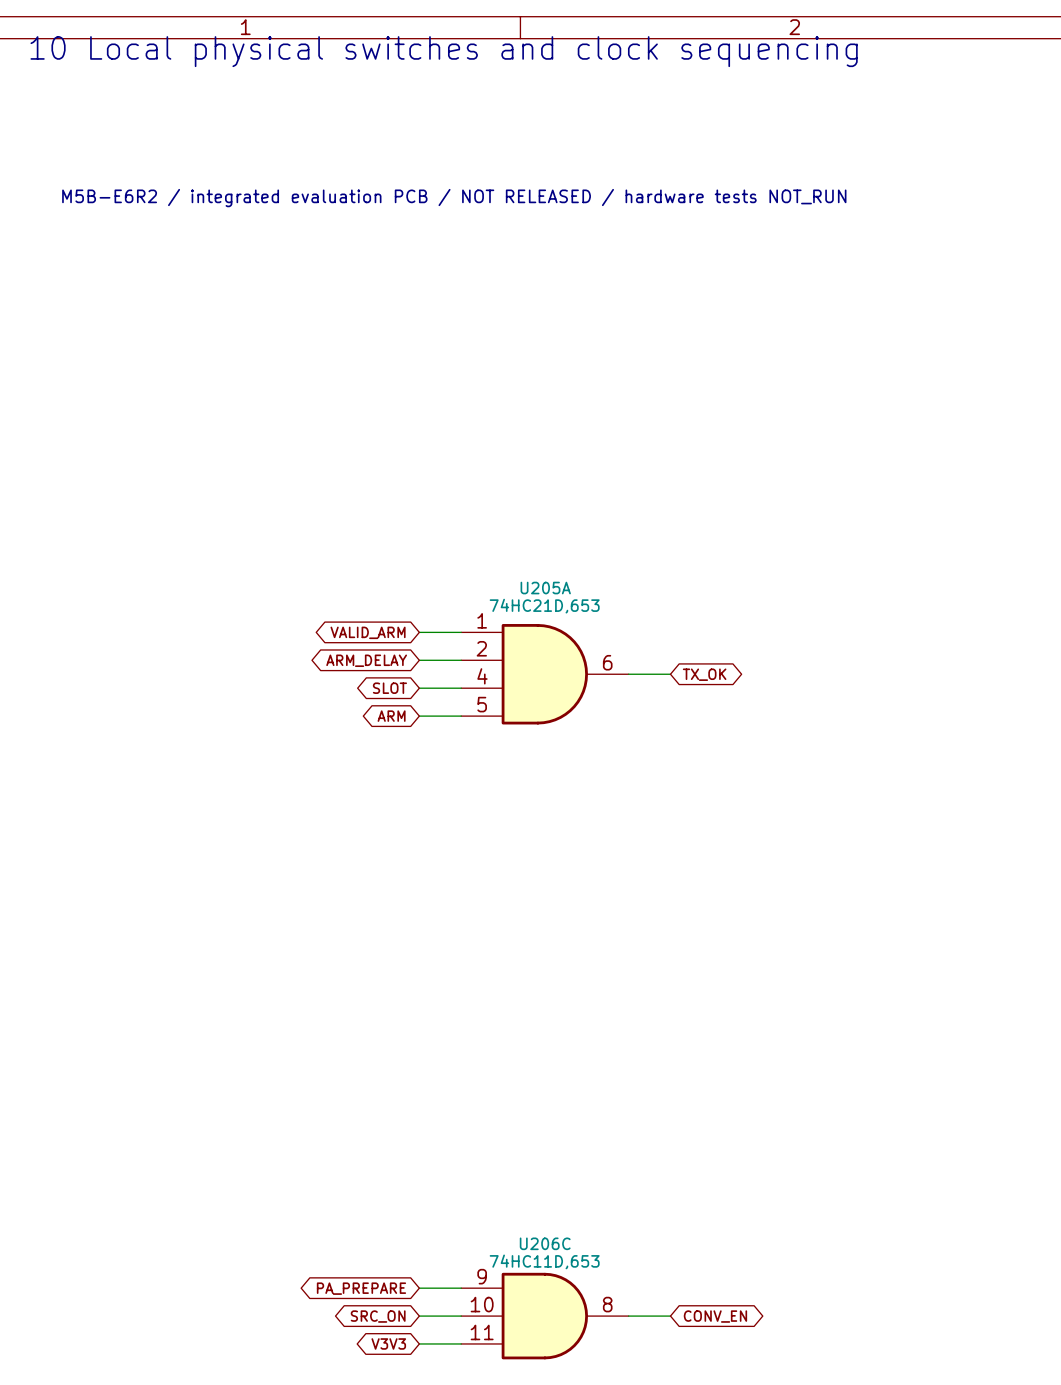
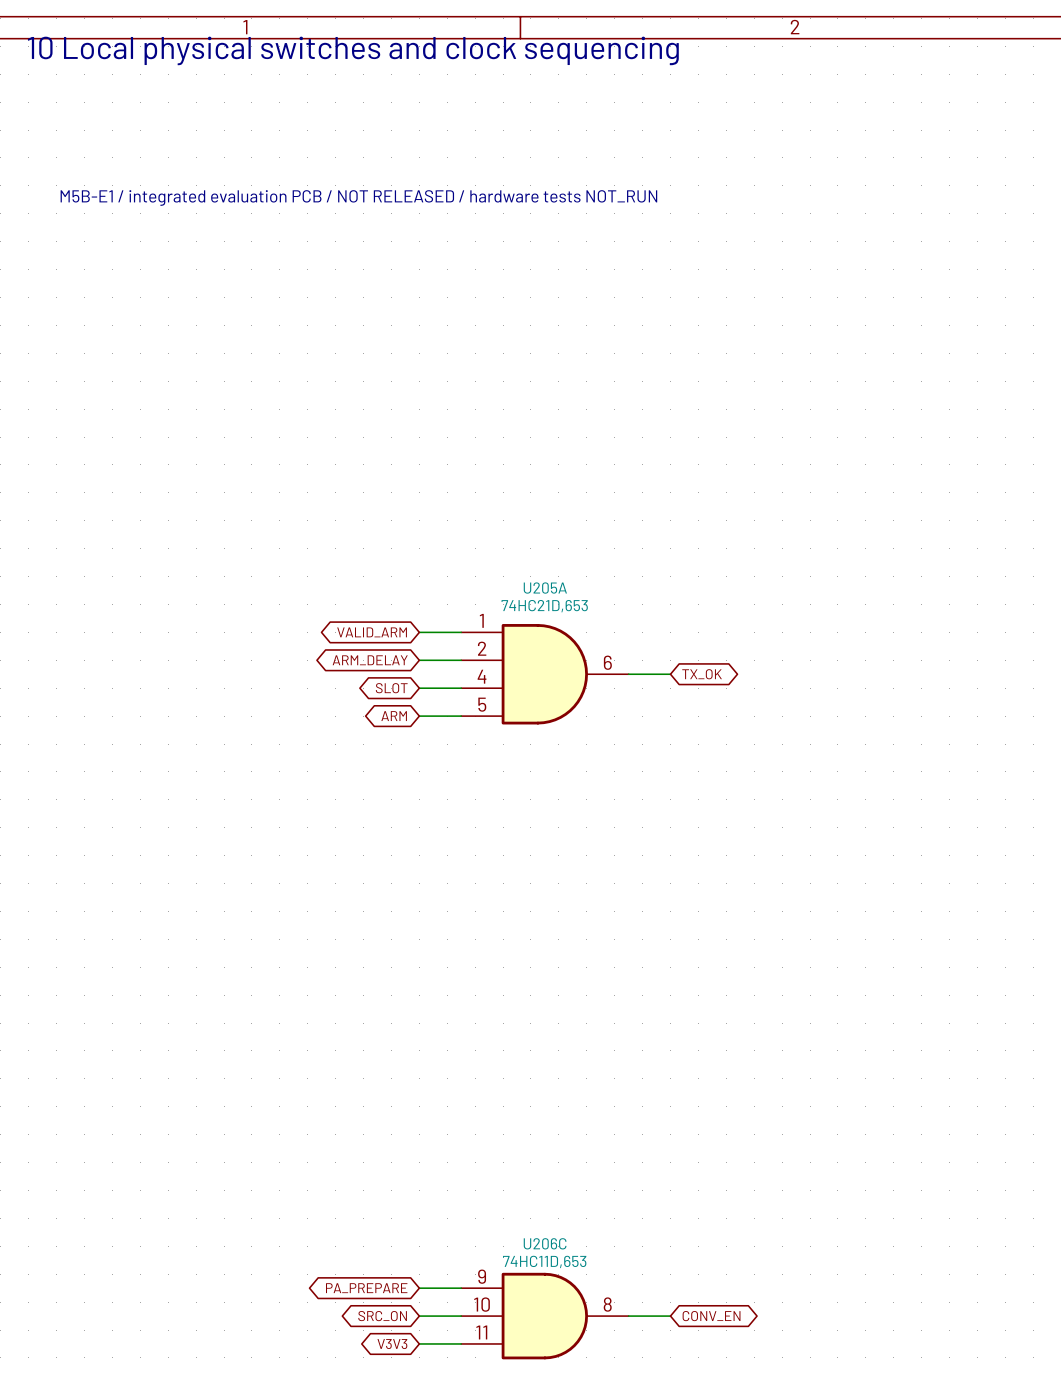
text: M5B-E6R2 / integrated evaluation PCB / NOT RELEASED / hardware tests NOT_RUN (454, 198) -> M5B-E1 / integrated evaluation PCB / NOT RELEASED / hardware tests NOT_RUN (358, 197)

